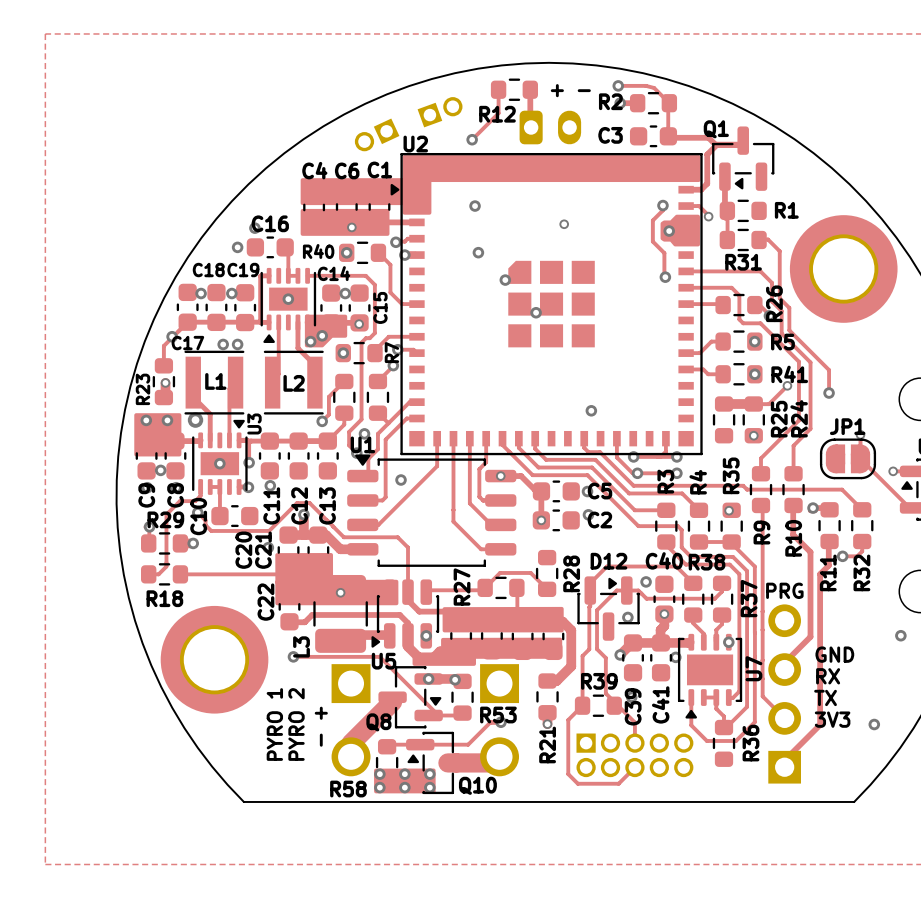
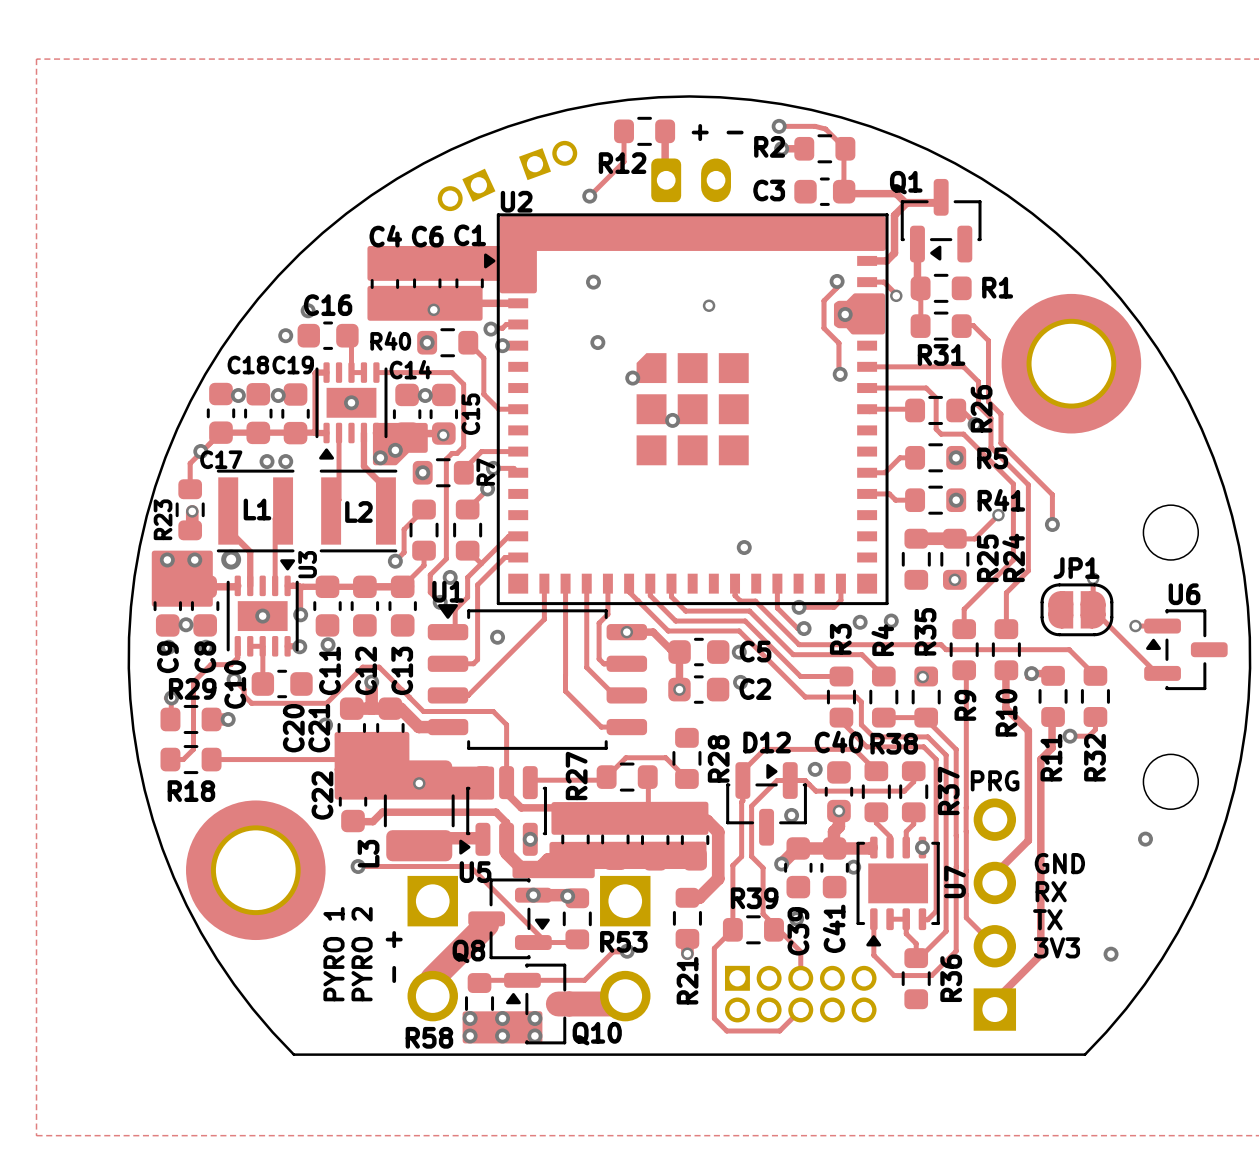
track: (660, 456) (676, 456) -> none
via: (676, 456) -> none
via: none -> (891, 621)
via: none -> (860, 622)
track: (637, 473) (676, 473) -> none
via: (676, 473) -> none

